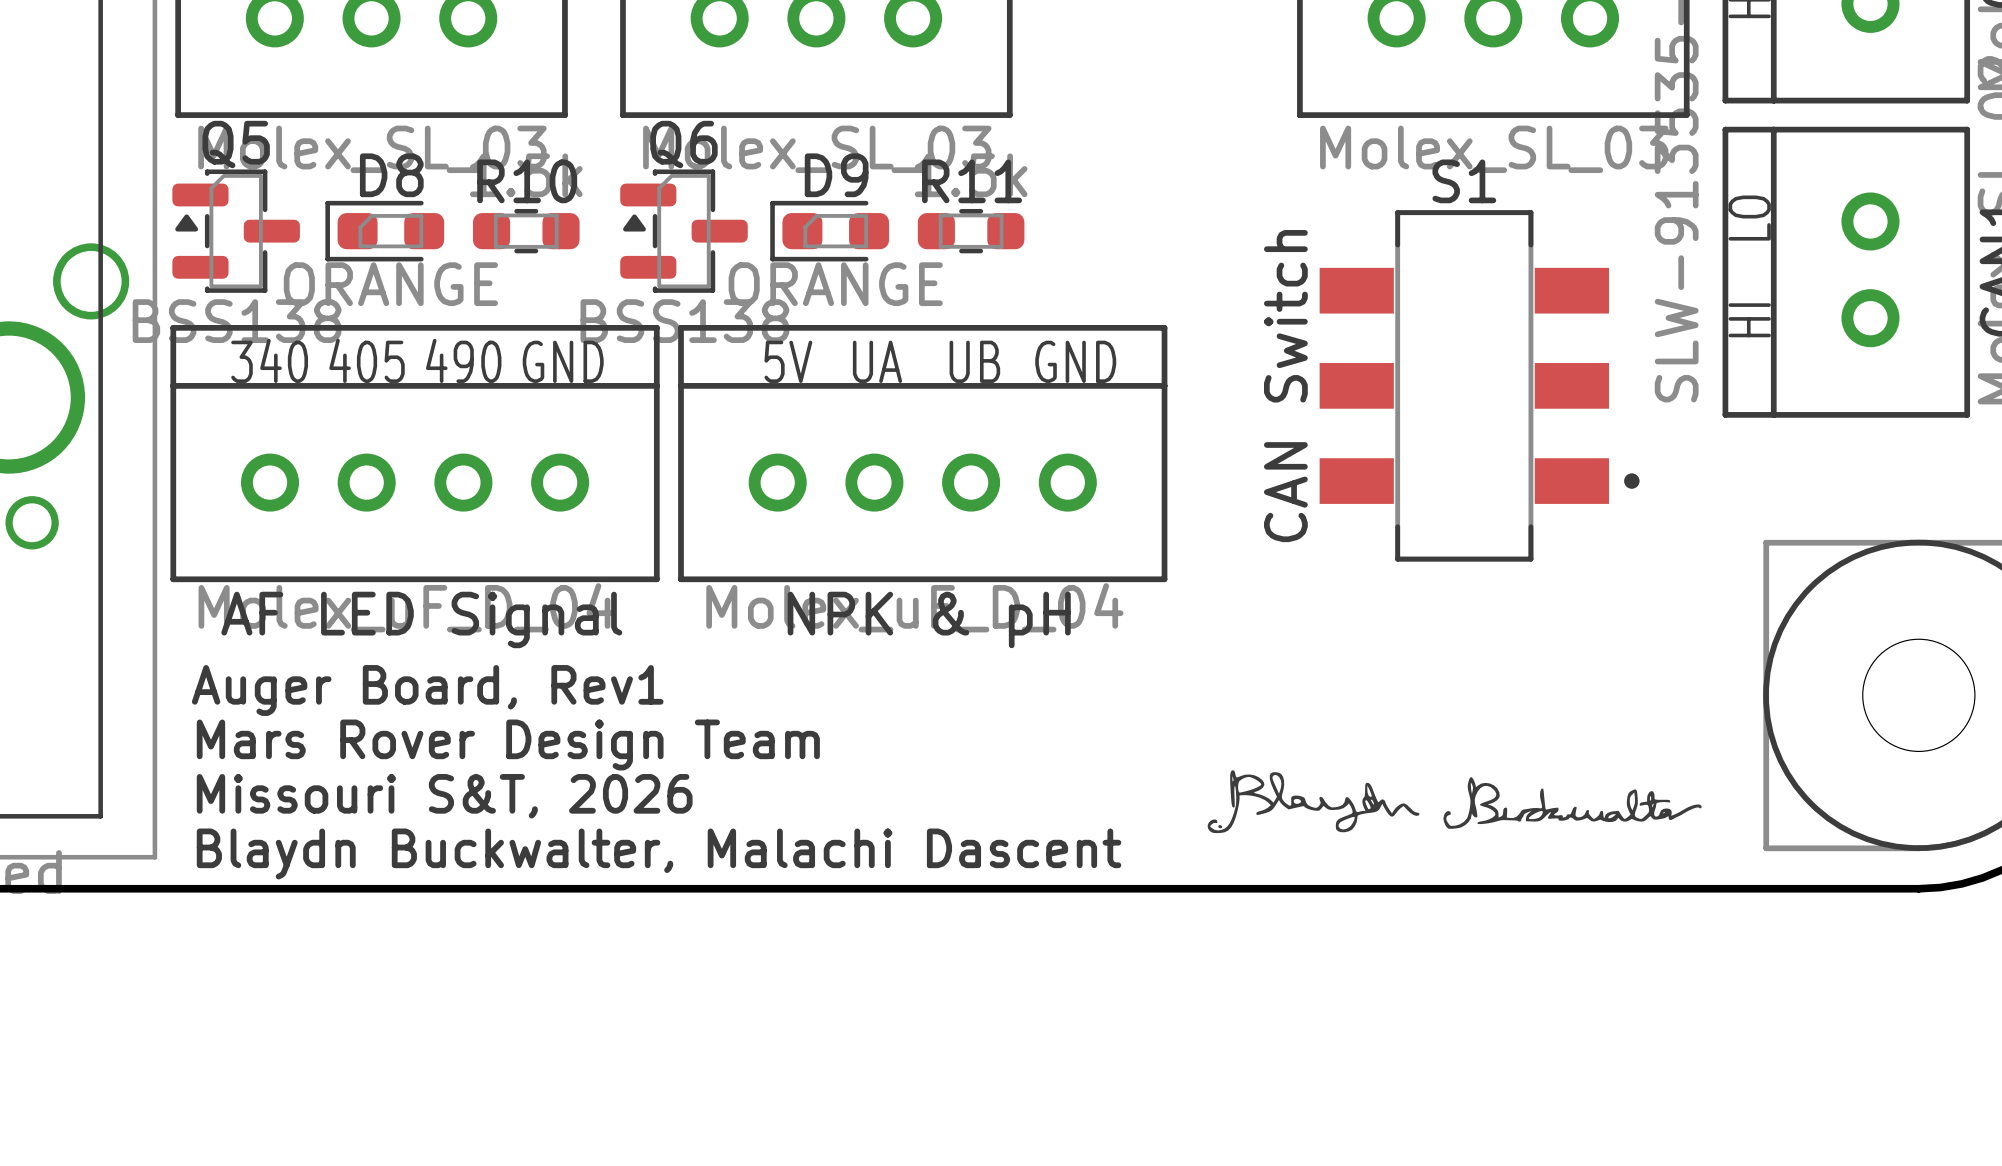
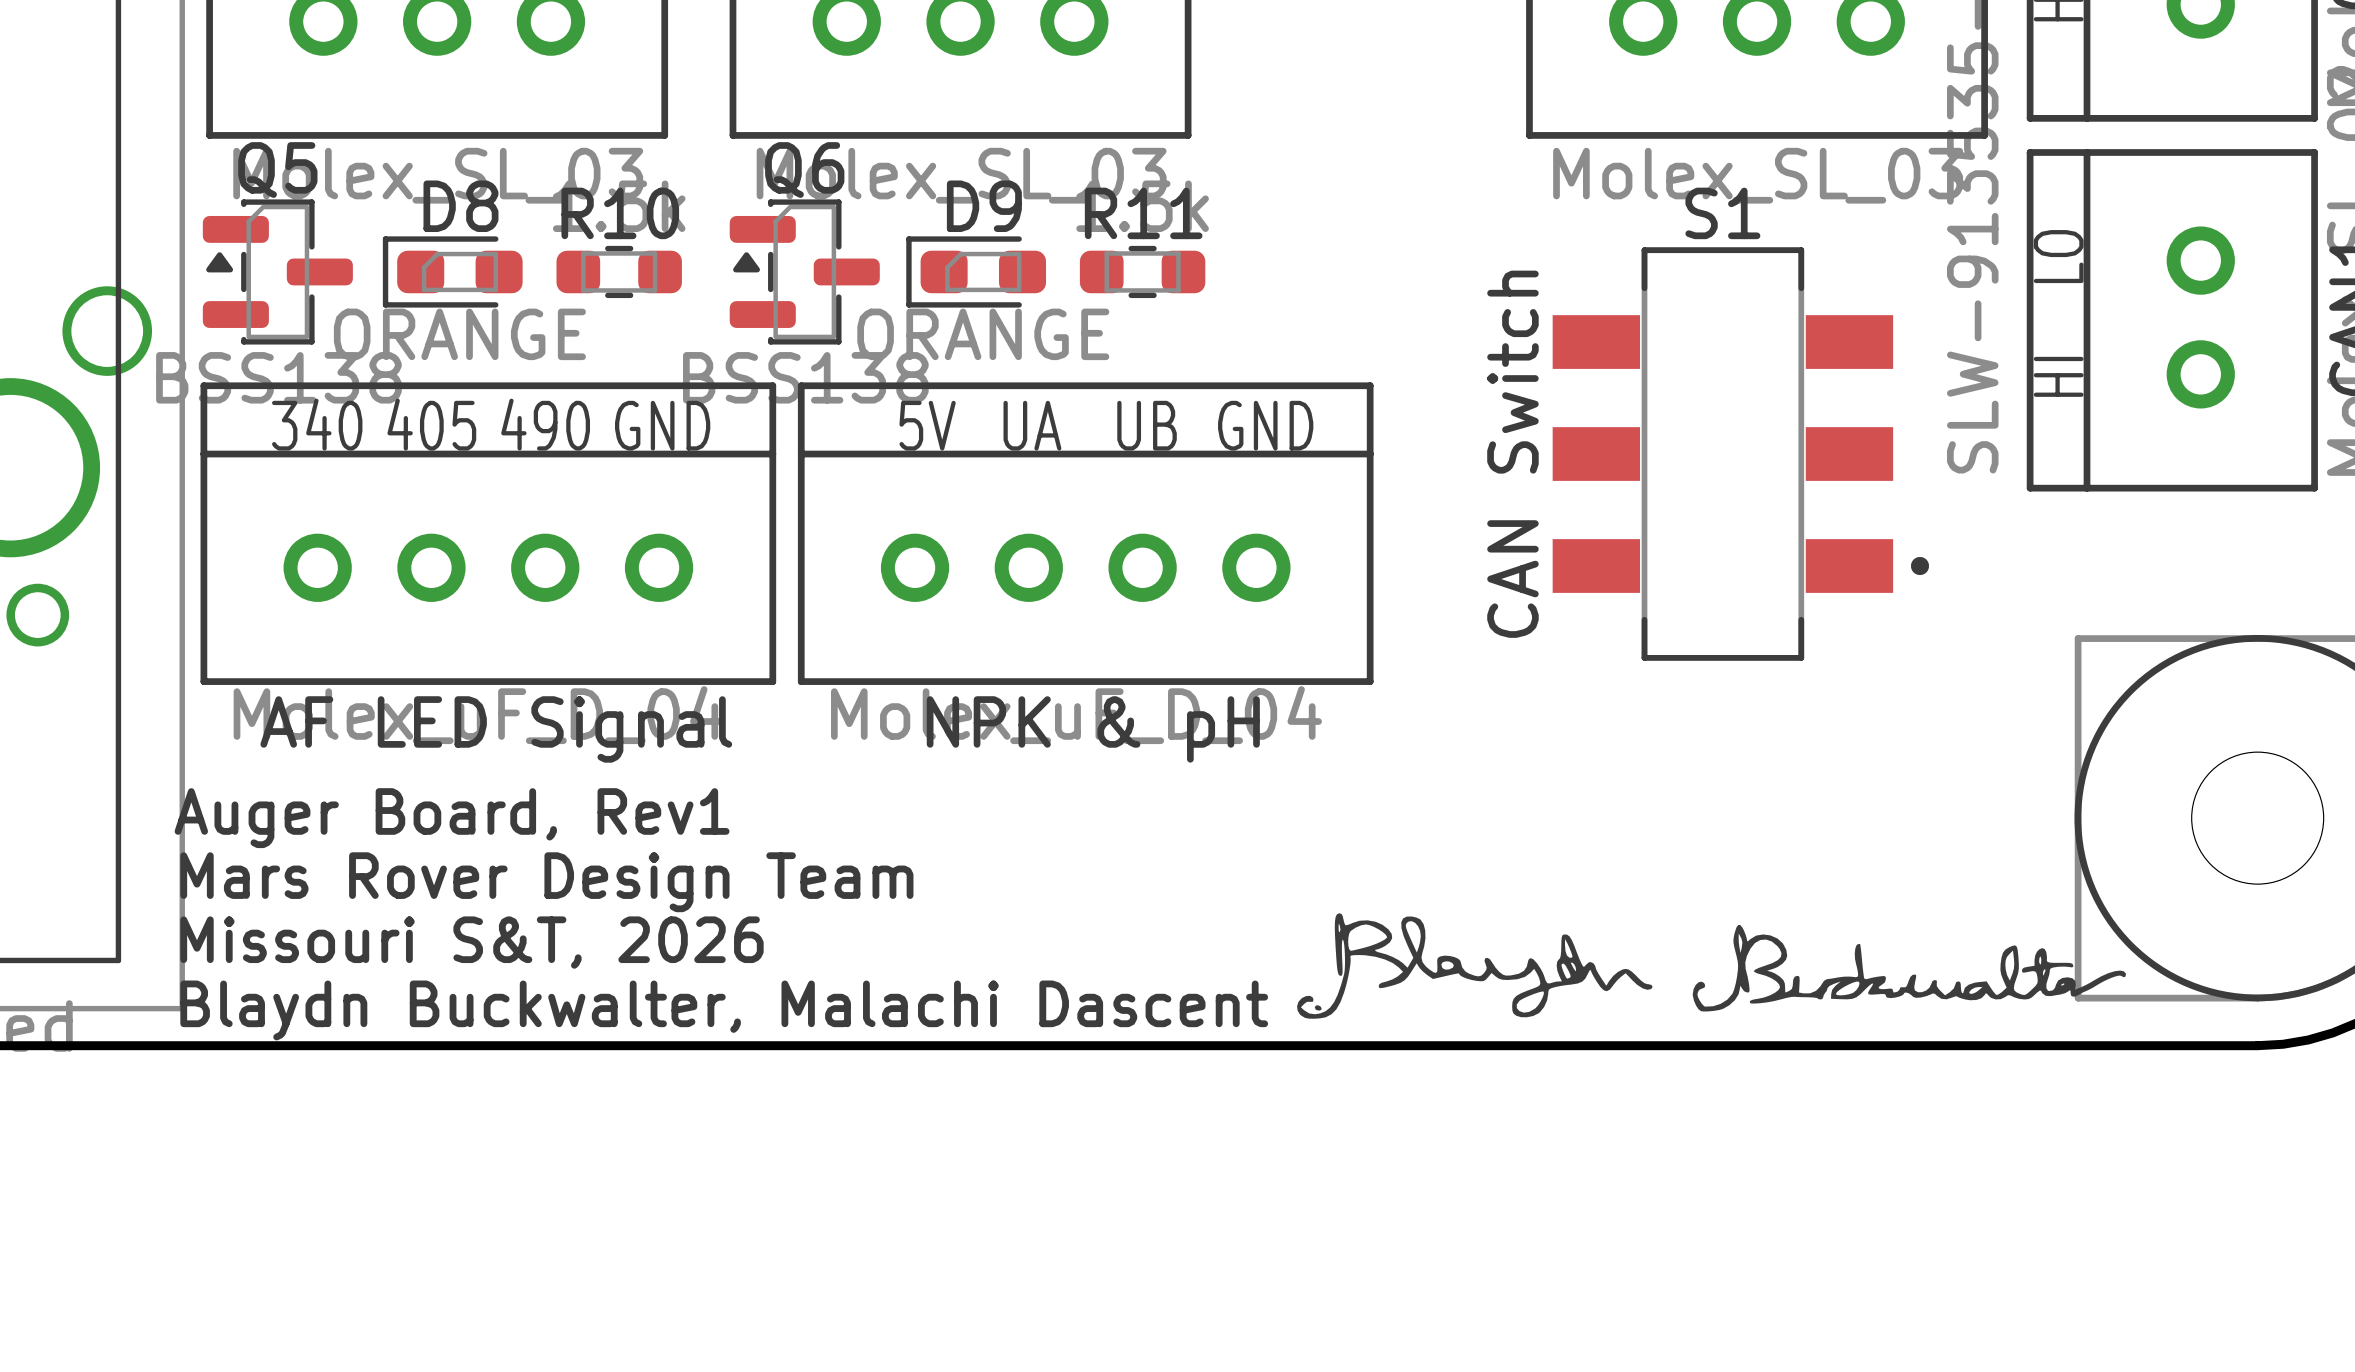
text position: Auger Board, Rev1 (427, 690) -> Auger Board, Rev1 (452, 818)
text position: Mars Rover Design Team (508, 744) -> Mars Rover Design Team (546, 882)
drawing shape: [1207, 770, 1702, 834] -> [1297, 913, 2126, 1019]
text position: Missouri S&T, 2026 (444, 796) -> Missouri S&T, 2026 (471, 942)
text position: Blaydn Buckwalter, Malachi Dascent (659, 853) -> Blaydn Buckwalter, Malachi Dascent (724, 1010)

